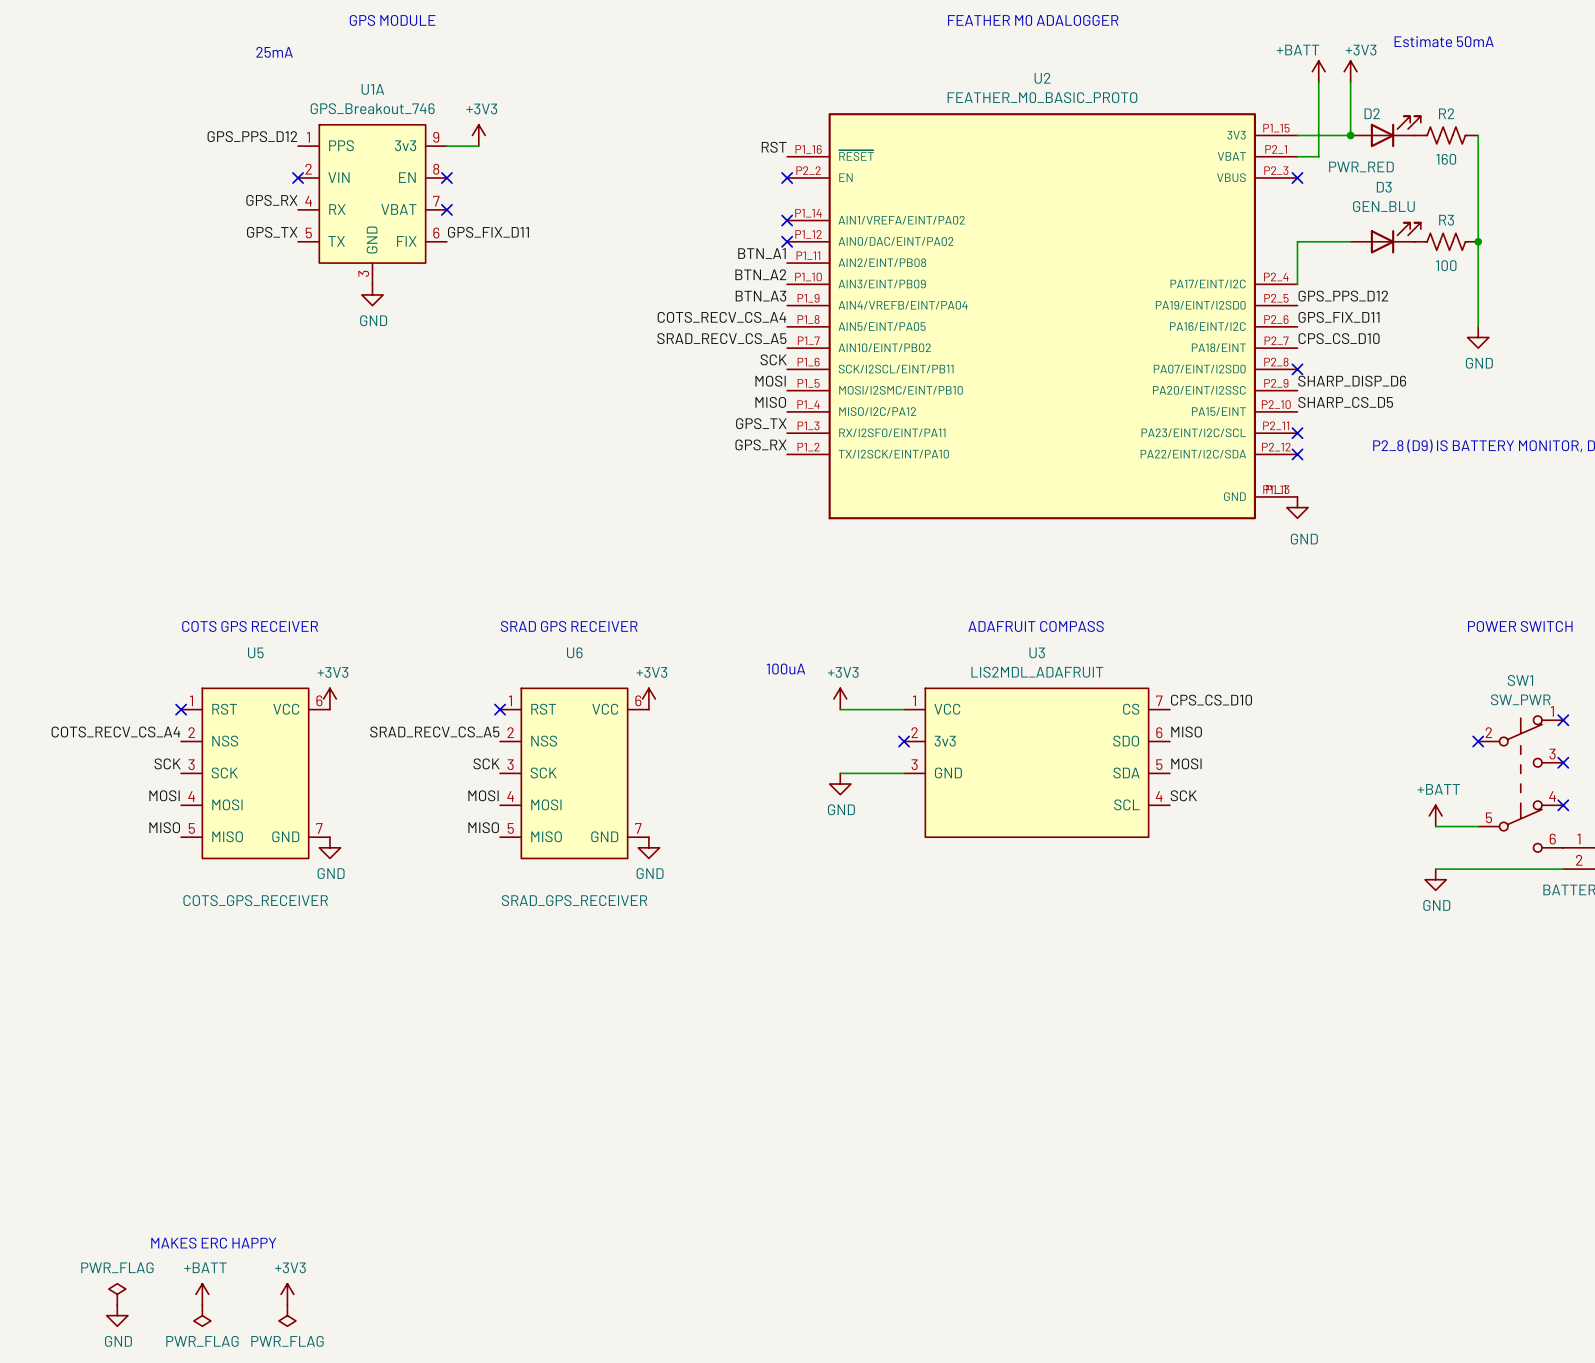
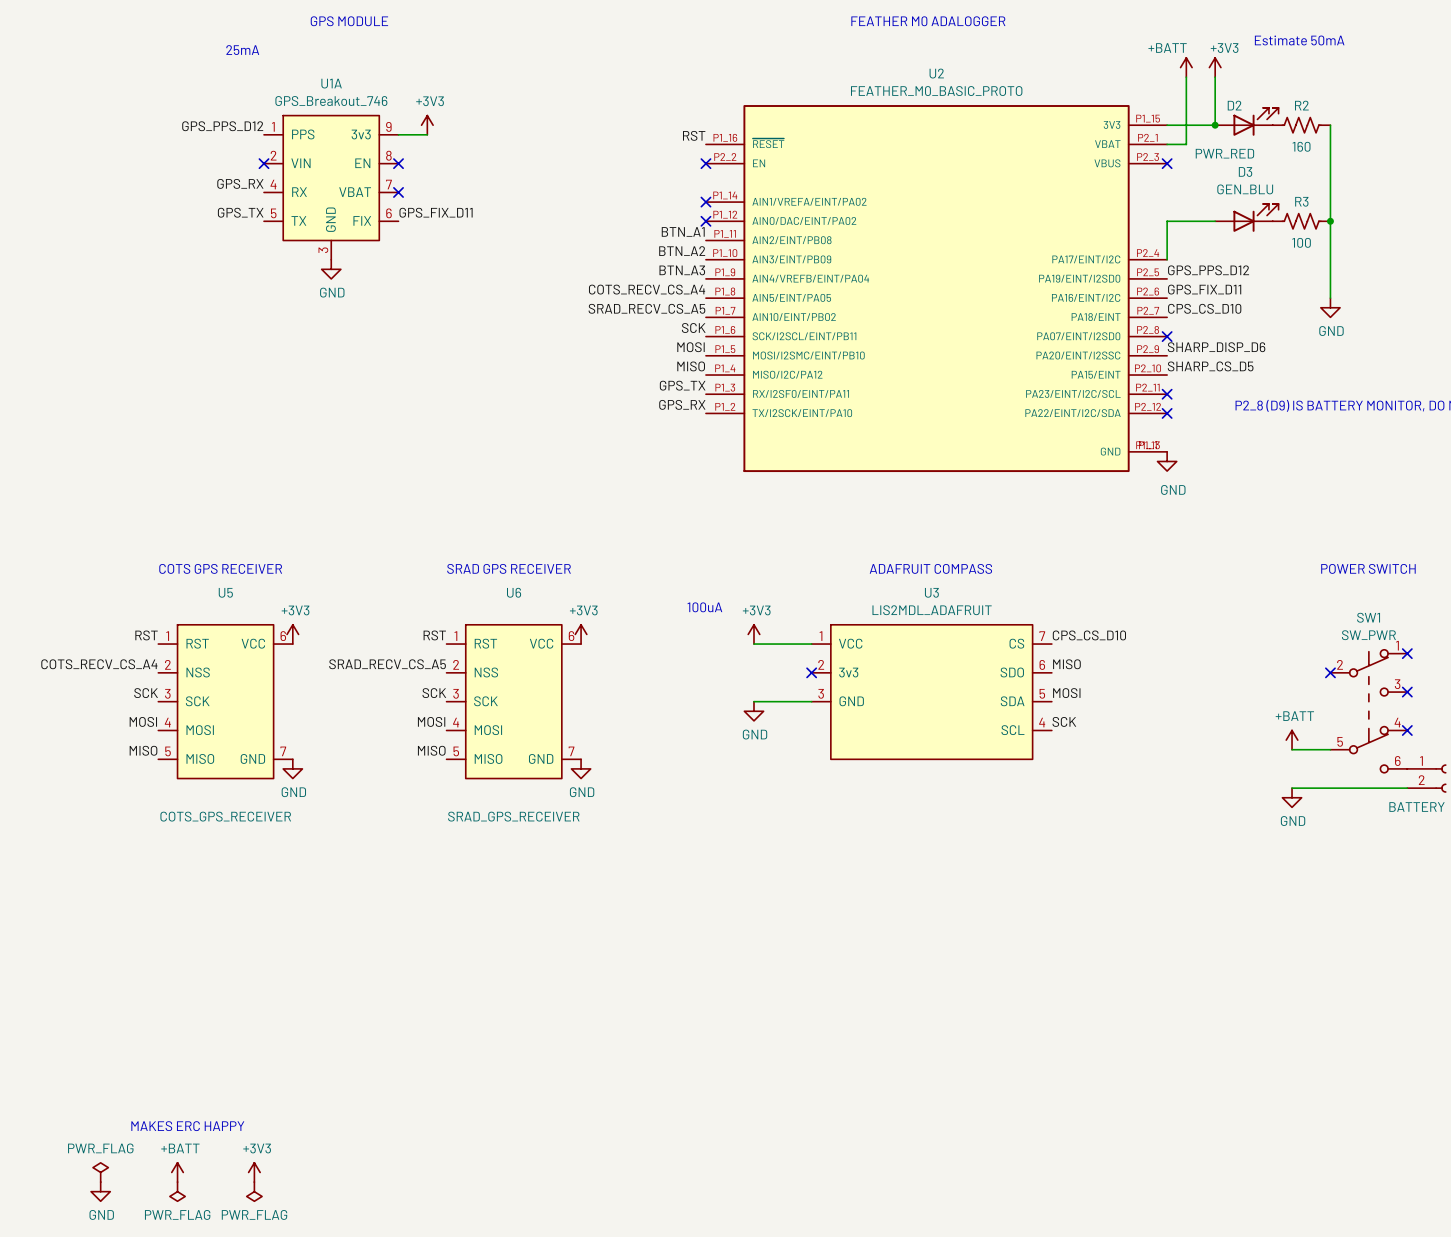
label: none -> RST (146, 635)
label: none -> RST (434, 635)
no-connect mark: (181, 709) -> none
no-connect mark: (500, 709) -> none

